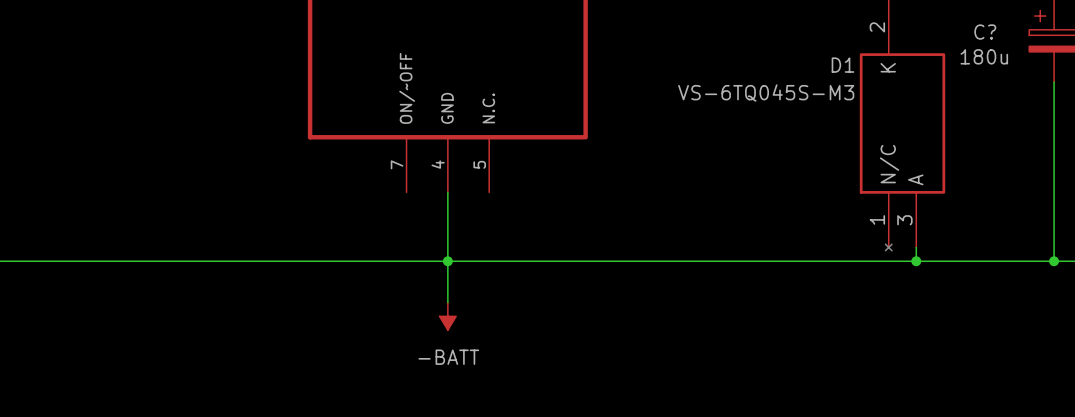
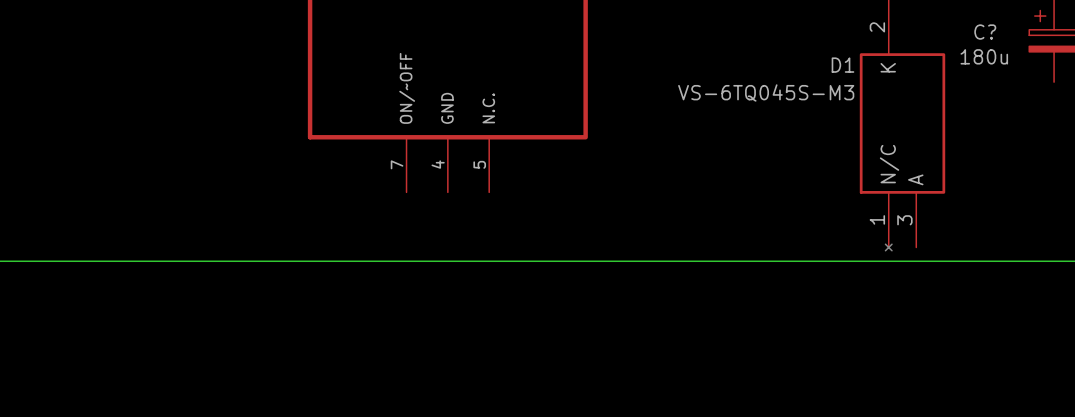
wire: (1054, 82) (1054, 261) -> none
wire: (447, 192) (447, 302) -> none
wire: (916, 247) (916, 261) -> none
junction: (447, 261) -> none
junction: (916, 261) -> none
junction: (1054, 261) -> none
power symbol: -BATT (447, 316) -> none

